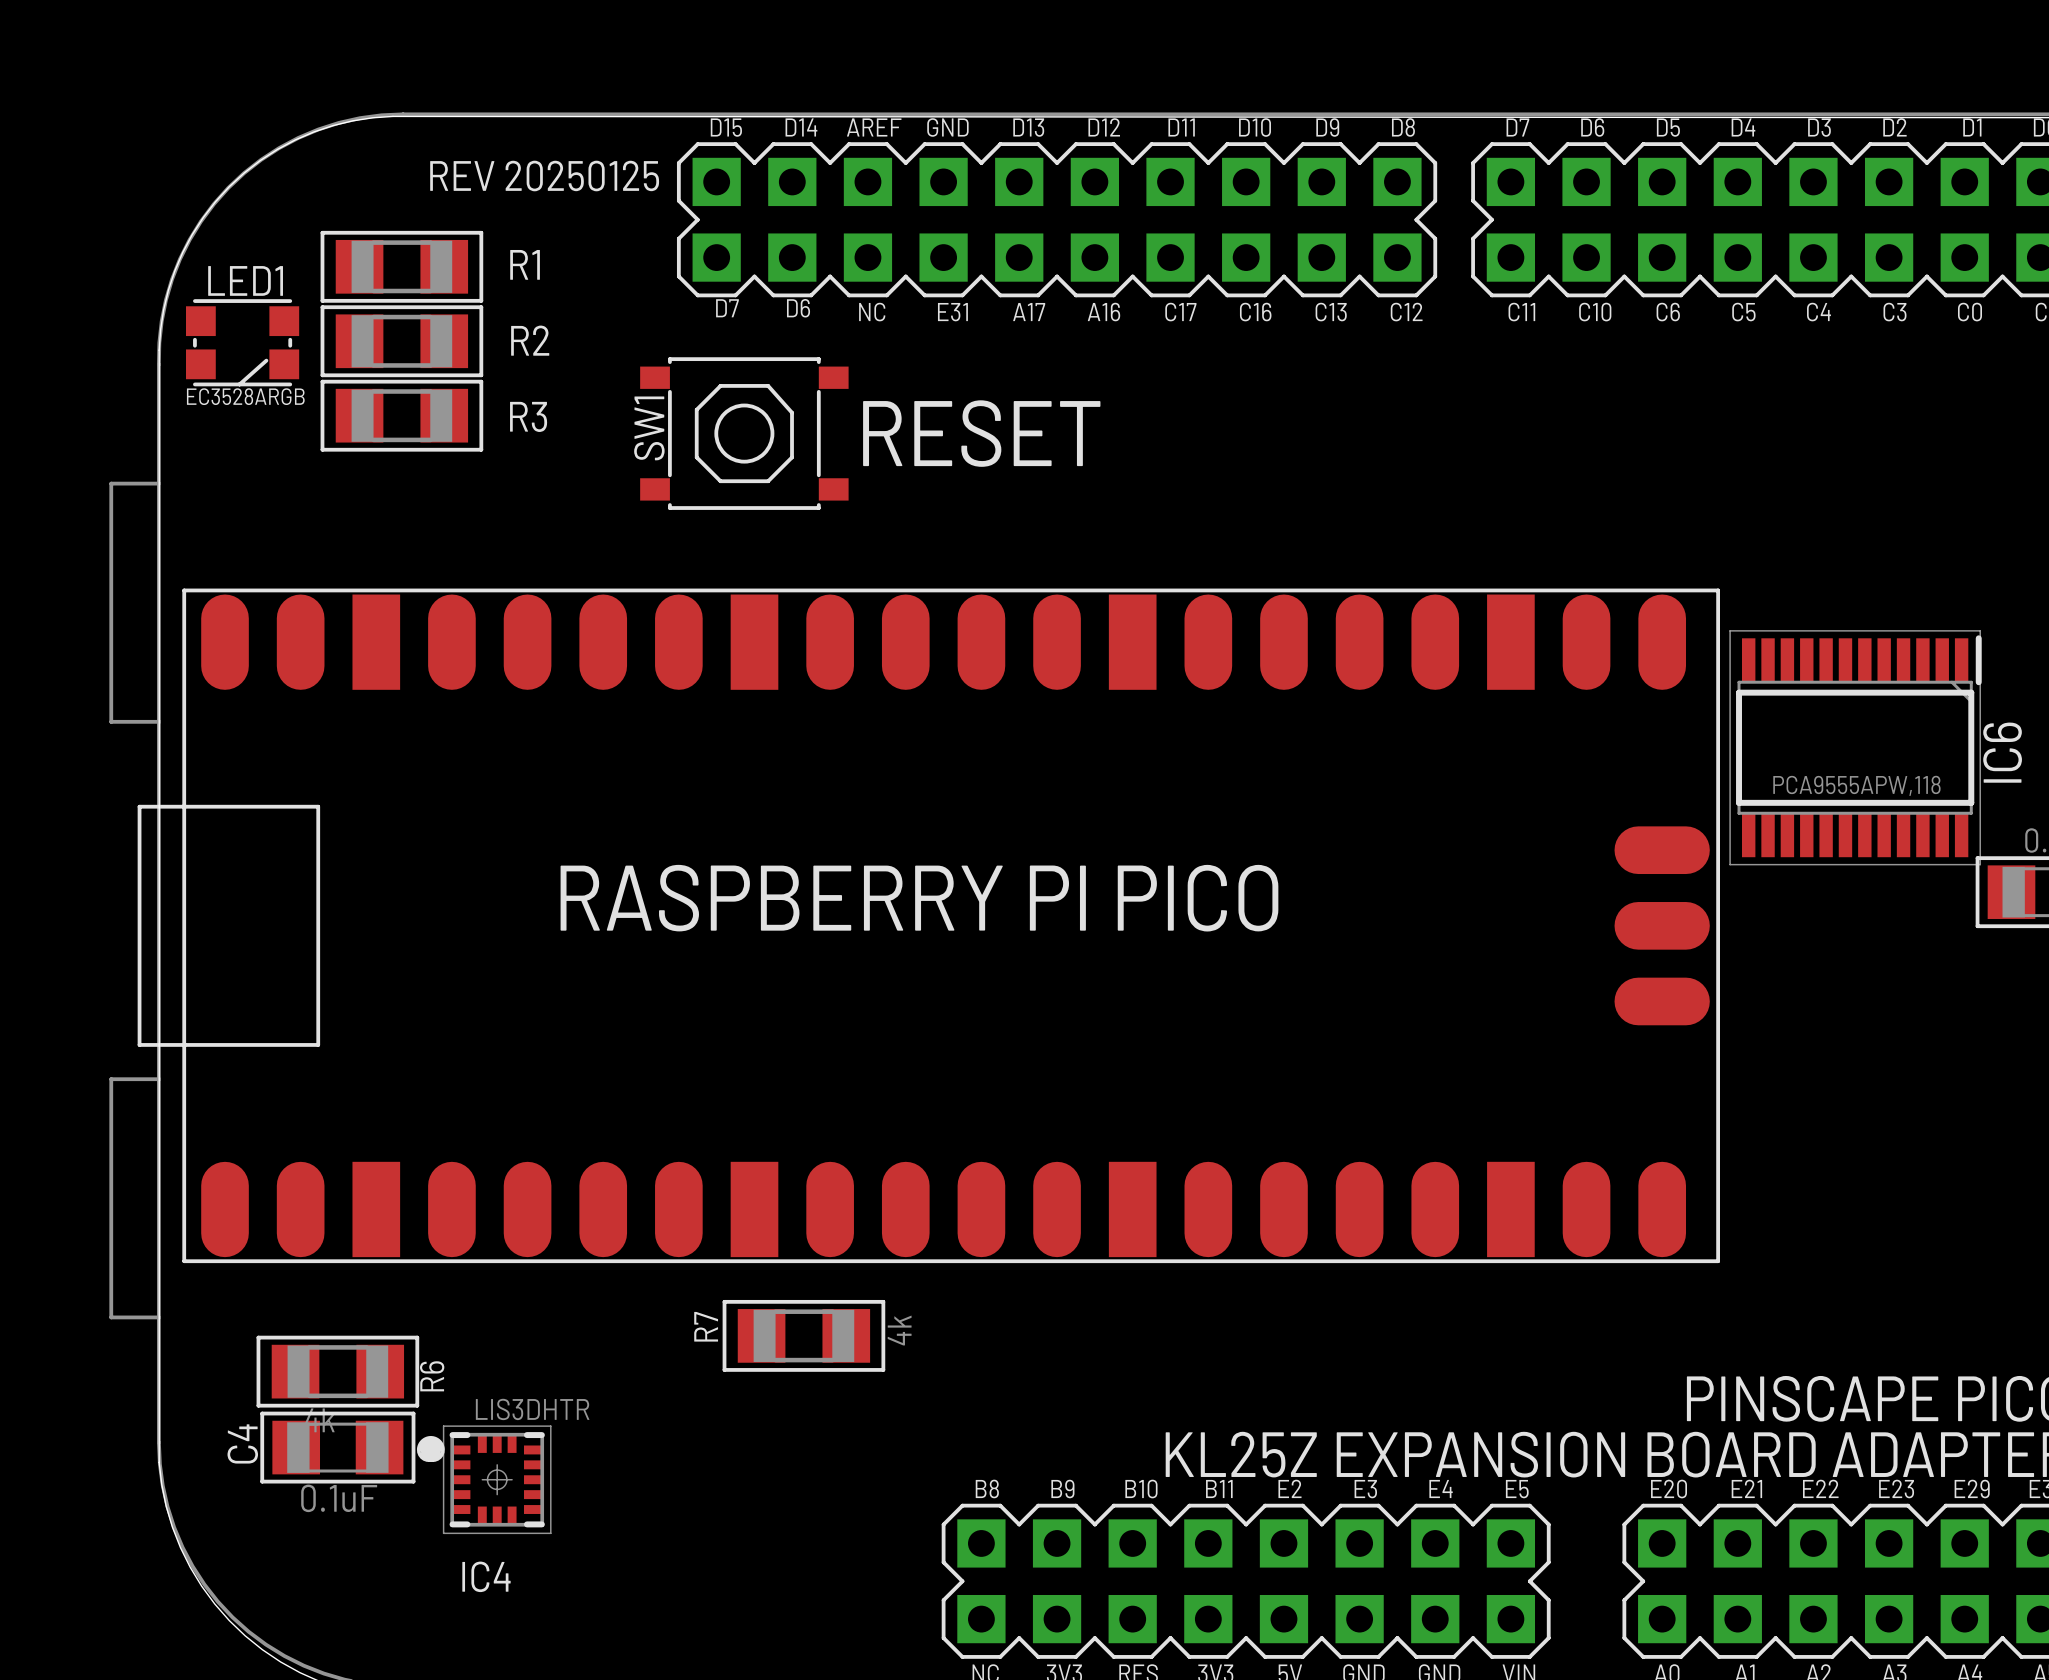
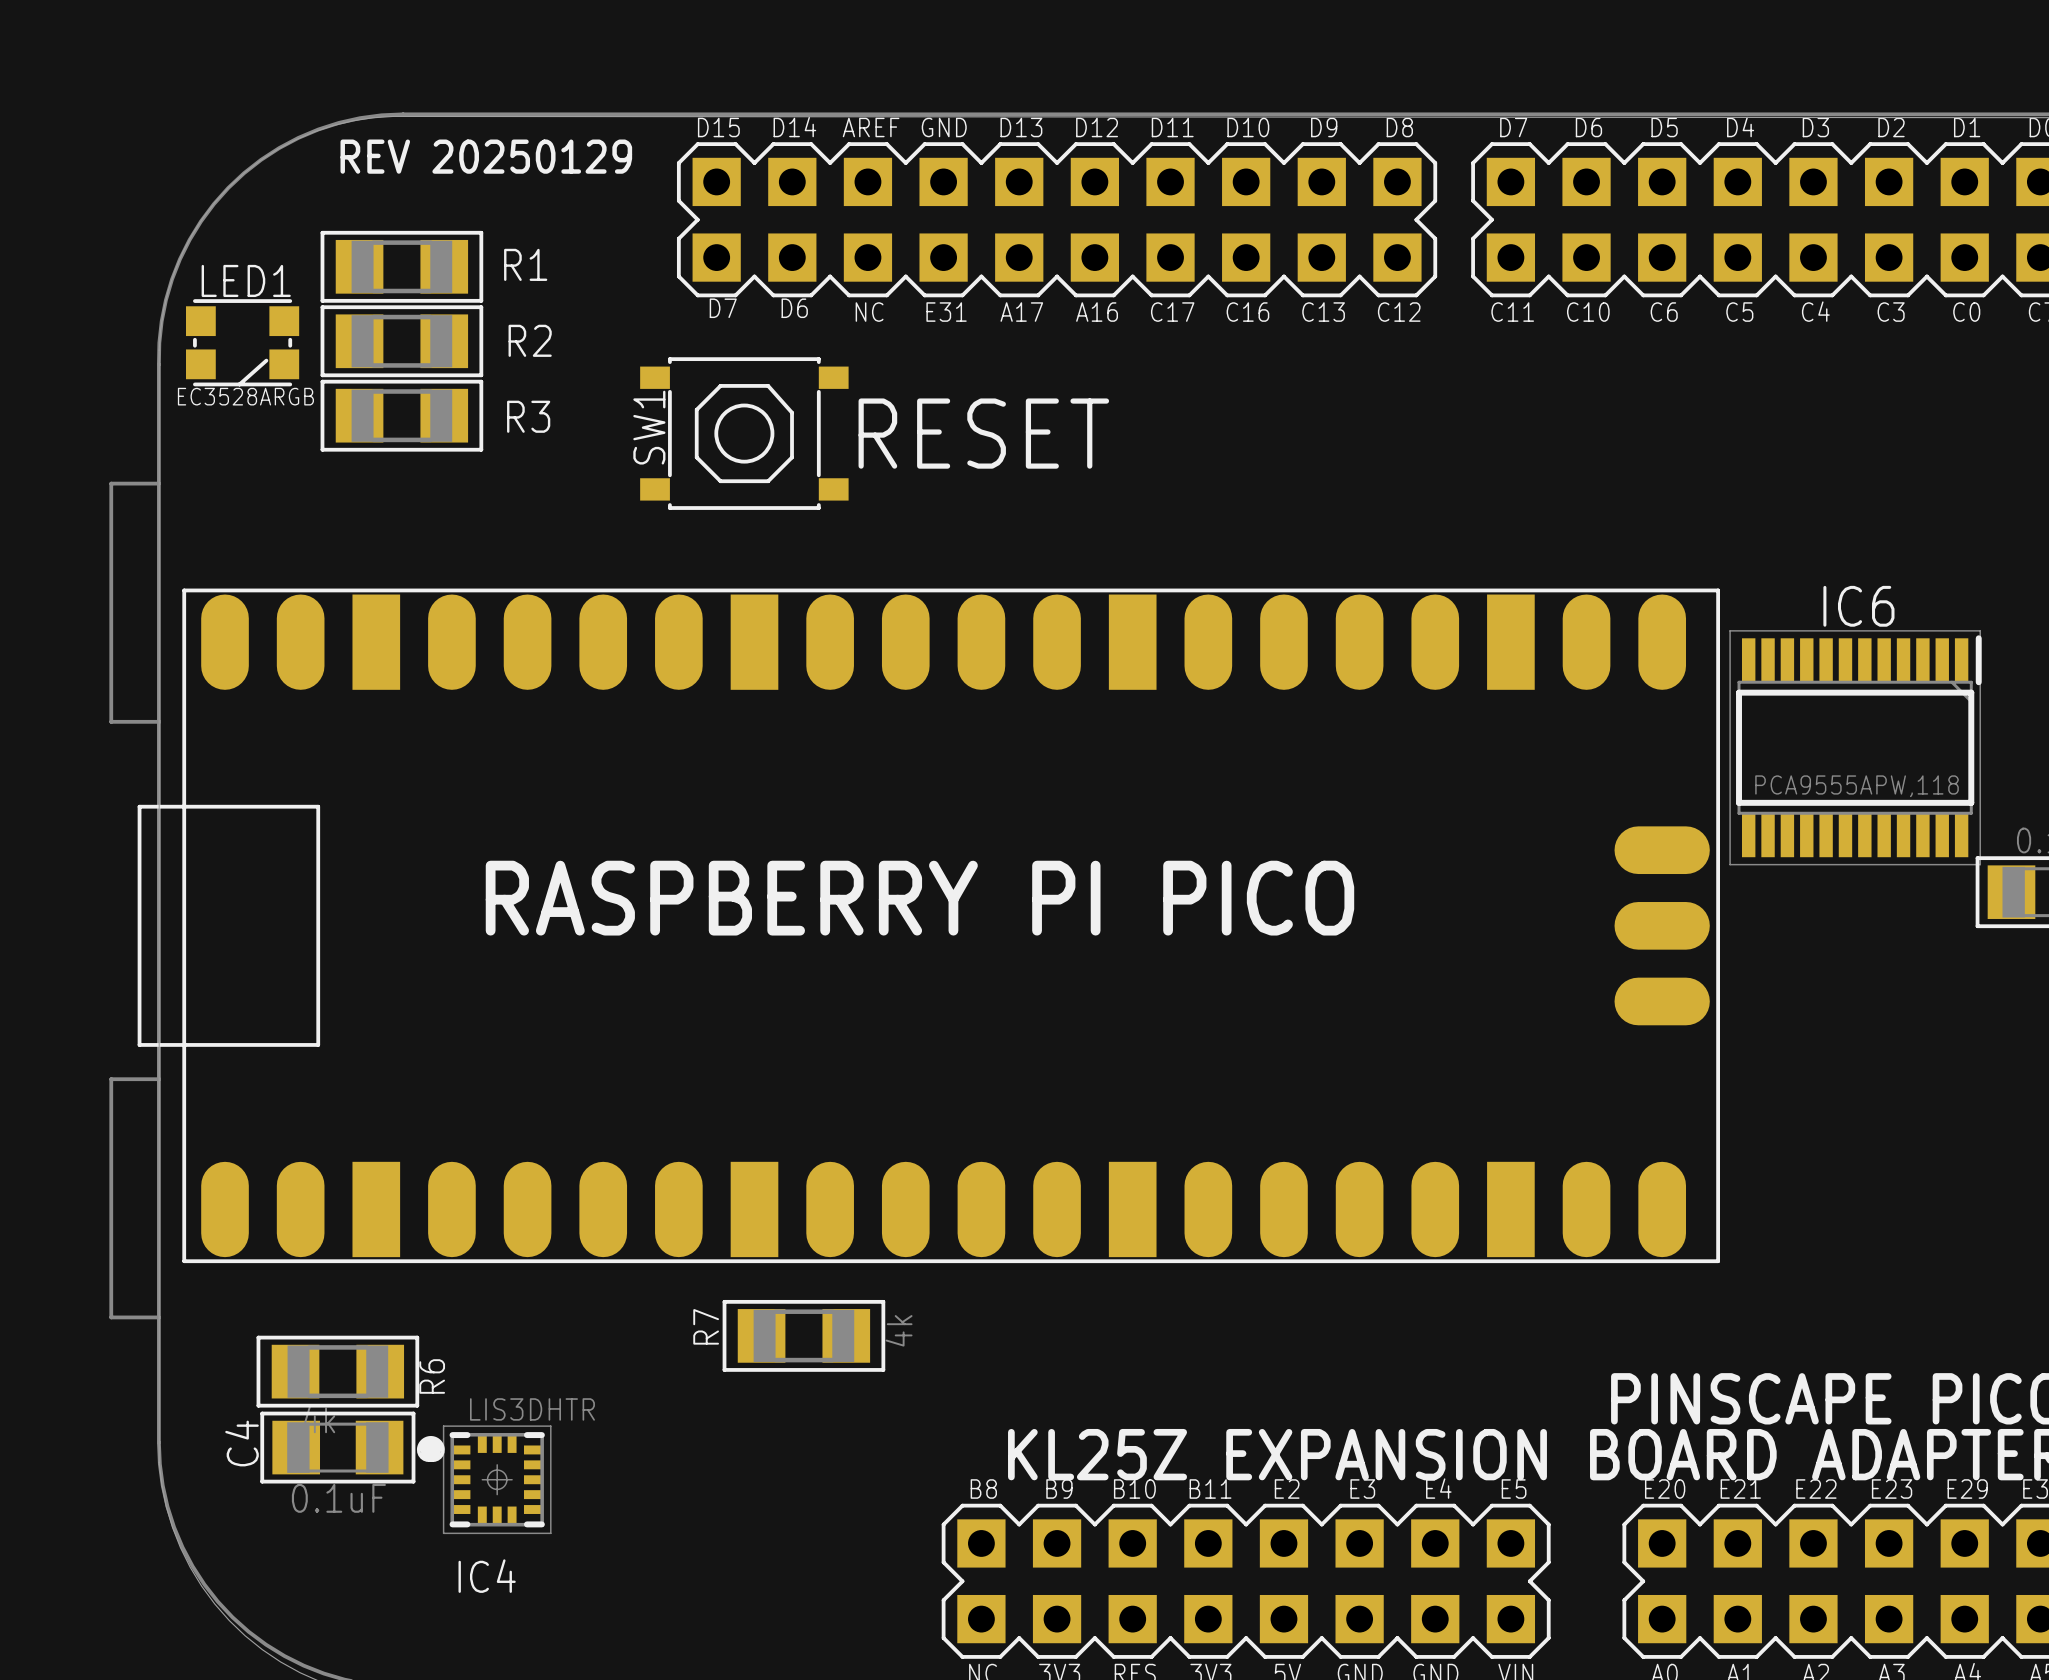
text: REV 20250125 (544, 176) -> REV 20250129 (486, 156)
IC6 name rotation: 0° (2002, 752) -> 90° clockwise (1858, 606)
IC6 name position: IC6 (2002, 752) -> IC6 (1858, 606)

